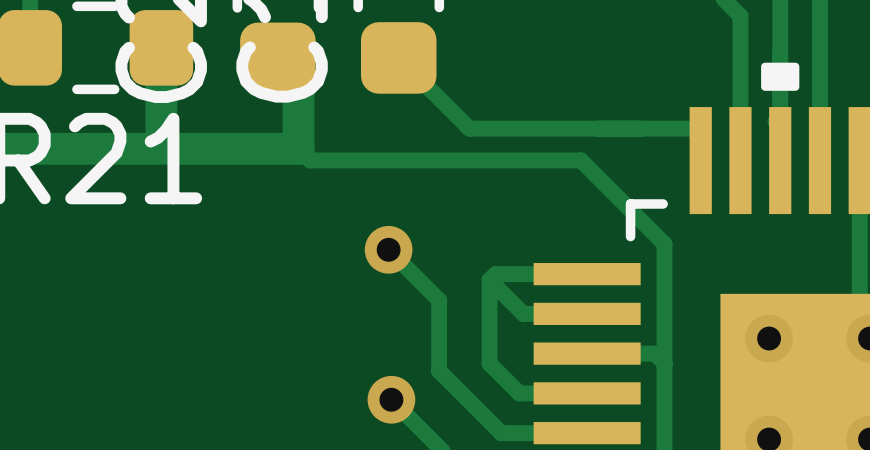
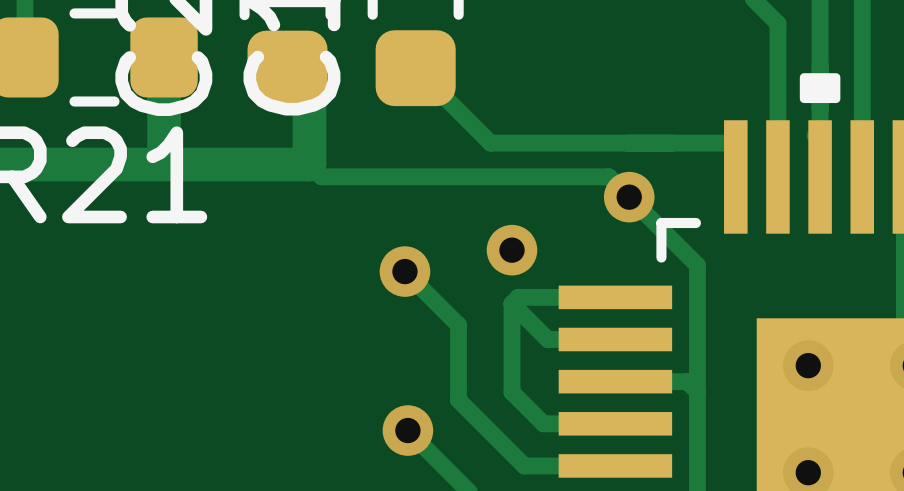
via: none -> (629, 197)
via: none -> (512, 250)

